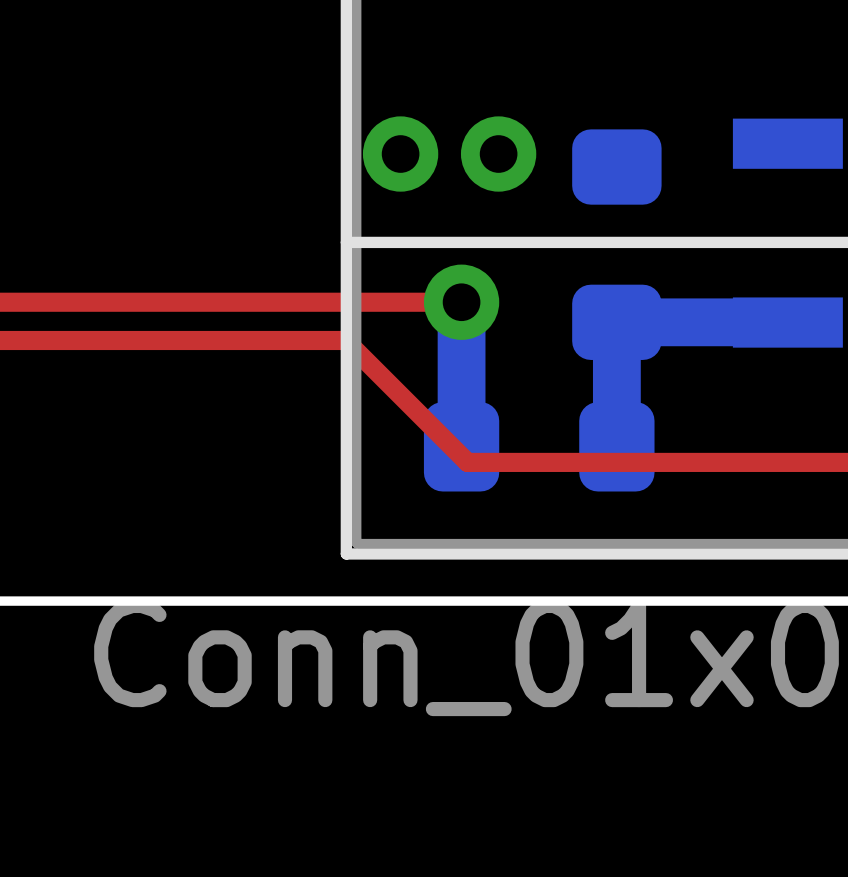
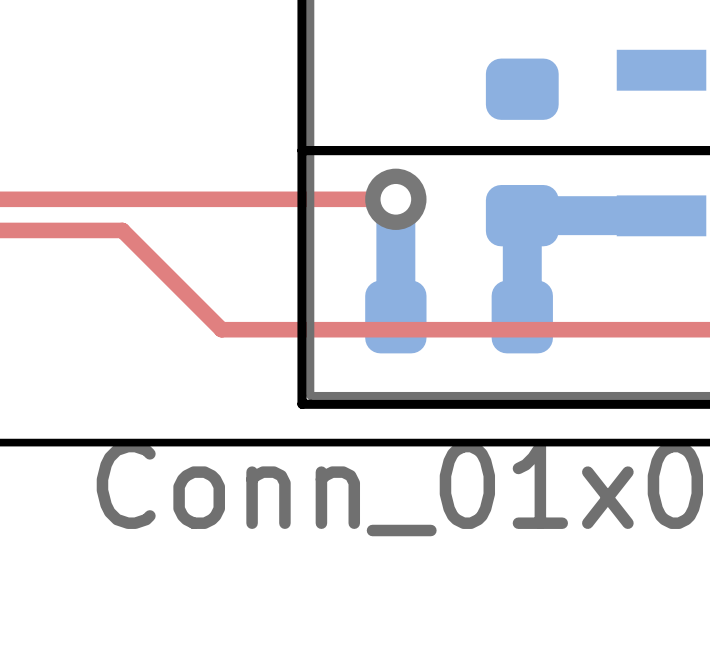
via: (400, 154) -> none
via: (498, 154) -> none
top track: (125, 340) (345, 340) (467, 462) -> (122, 230) (221, 329) (400, 329)

